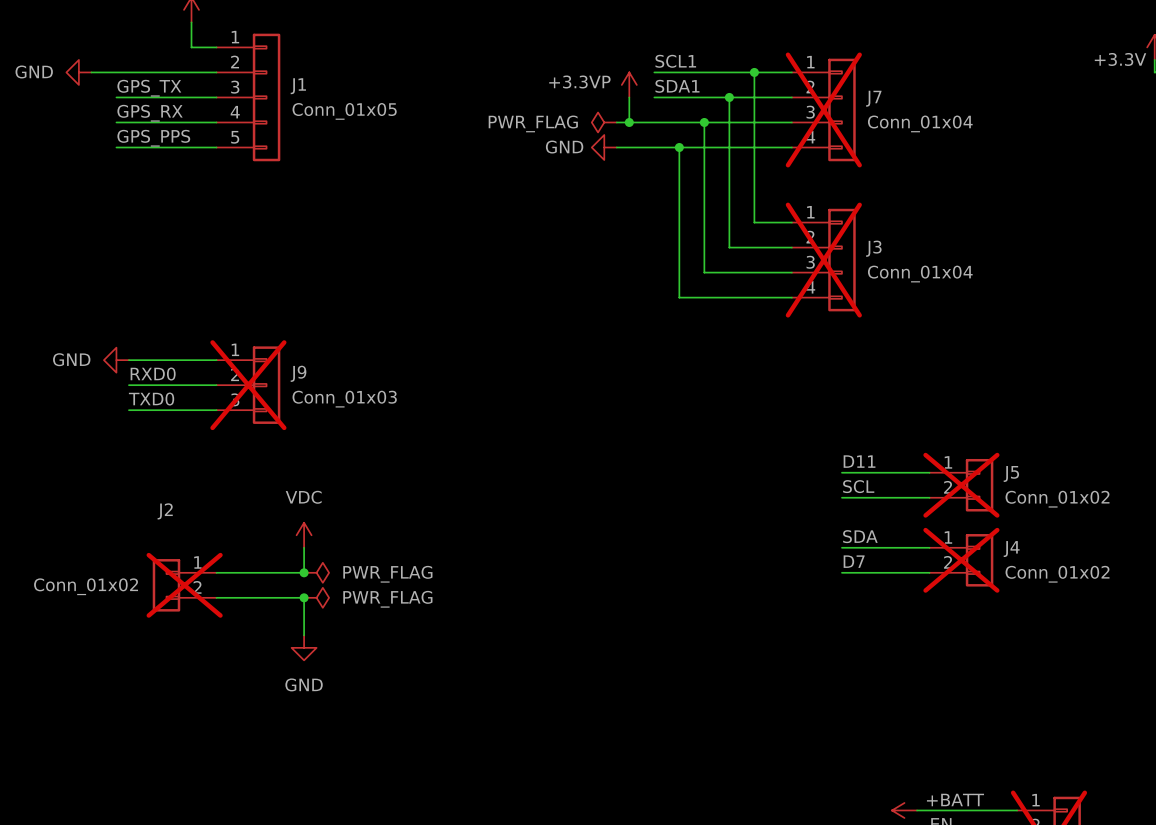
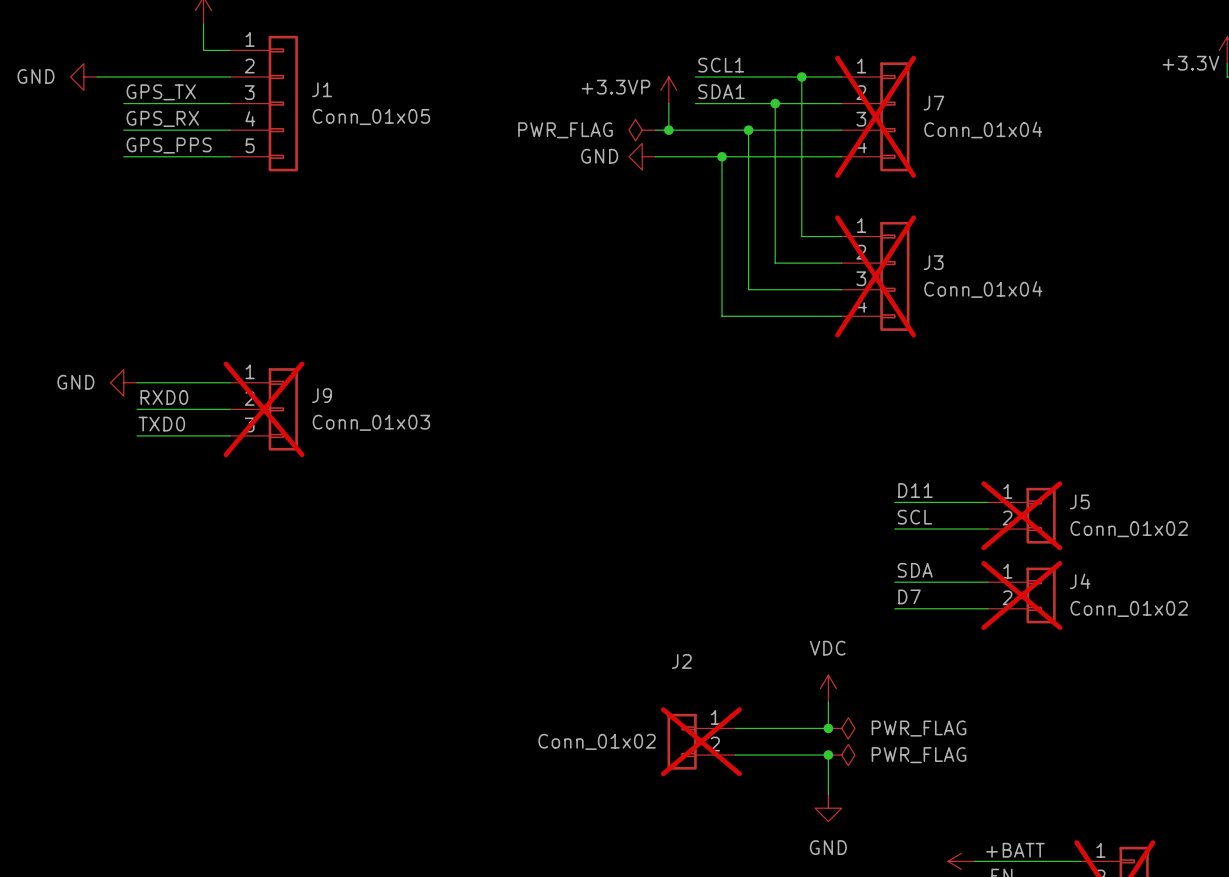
power symbol: VDC (304, 535) -> none
wire: (304, 547) (304, 572) (216, 572) -> none
junction: (304, 572) -> none
power symbol: PWR_FLAG (316, 572) -> none
J2 position: (184, 585) -> (701, 741)
wire: (216, 597) (304, 597) (304, 635) -> none
junction: (304, 597) -> none
power symbol: PWR_FLAG (316, 597) -> none
power symbol: GND (304, 647) -> none
power symbol: none -> VDC (828, 688)
wire: none -> (828, 701) (828, 728) (735, 728)
junction: none -> (828, 728)
power symbol: none -> PWR_FLAG (841, 728)
wire: none -> (735, 755) (828, 755) (828, 794)
junction: none -> (828, 755)
power symbol: none -> PWR_FLAG (841, 755)
power symbol: none -> GND (828, 808)

